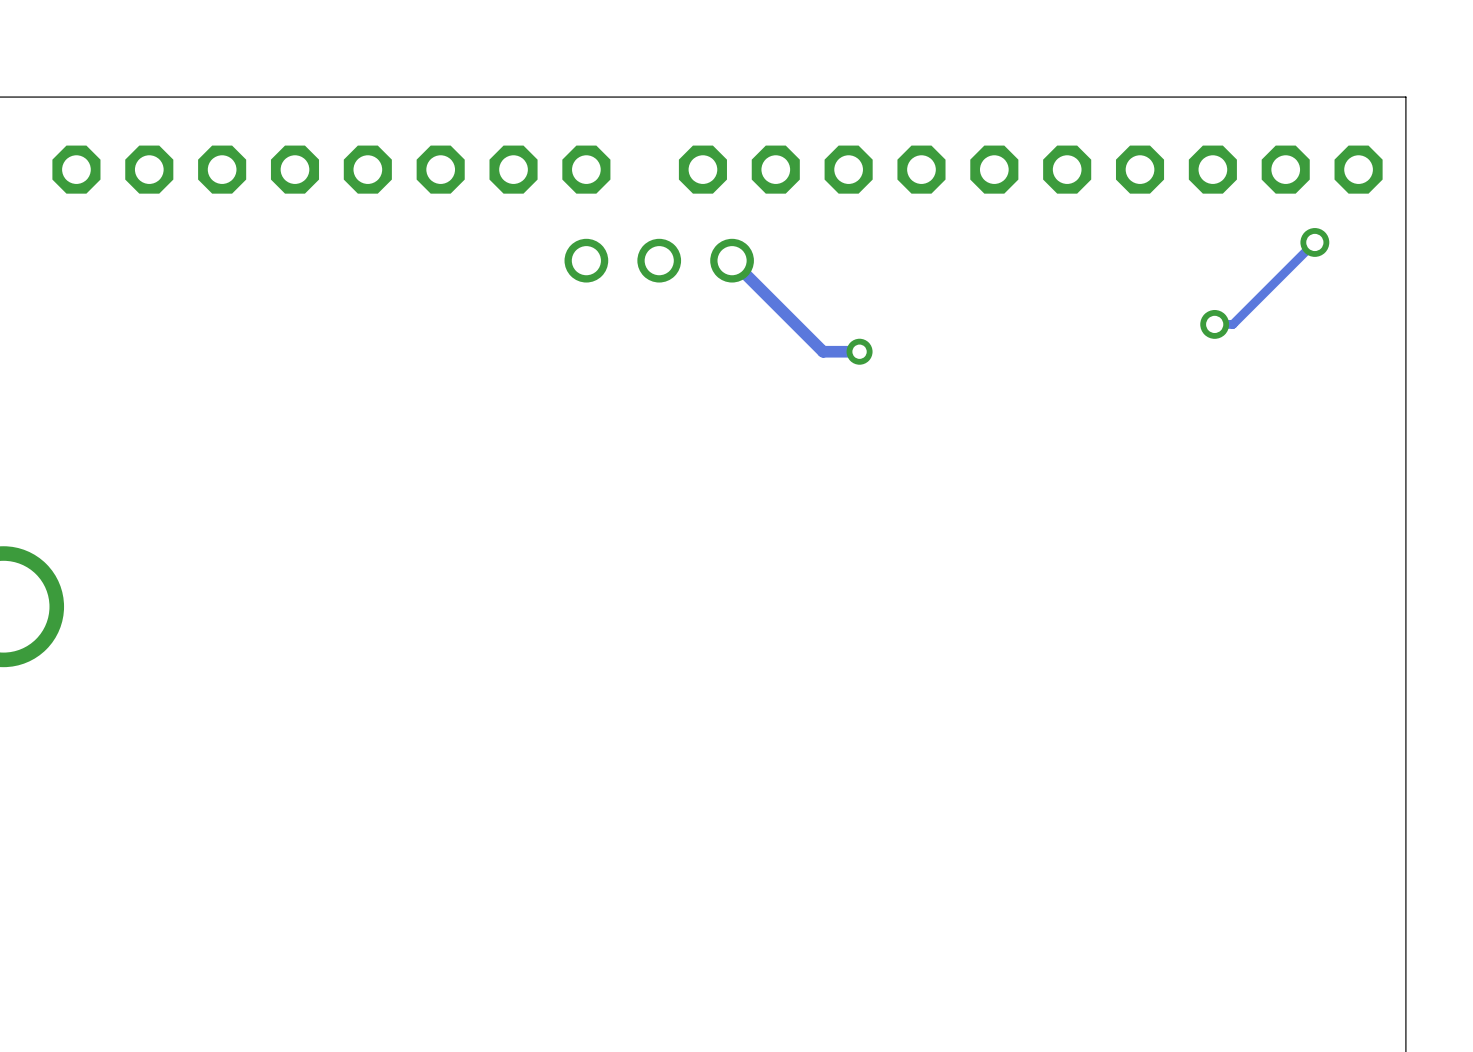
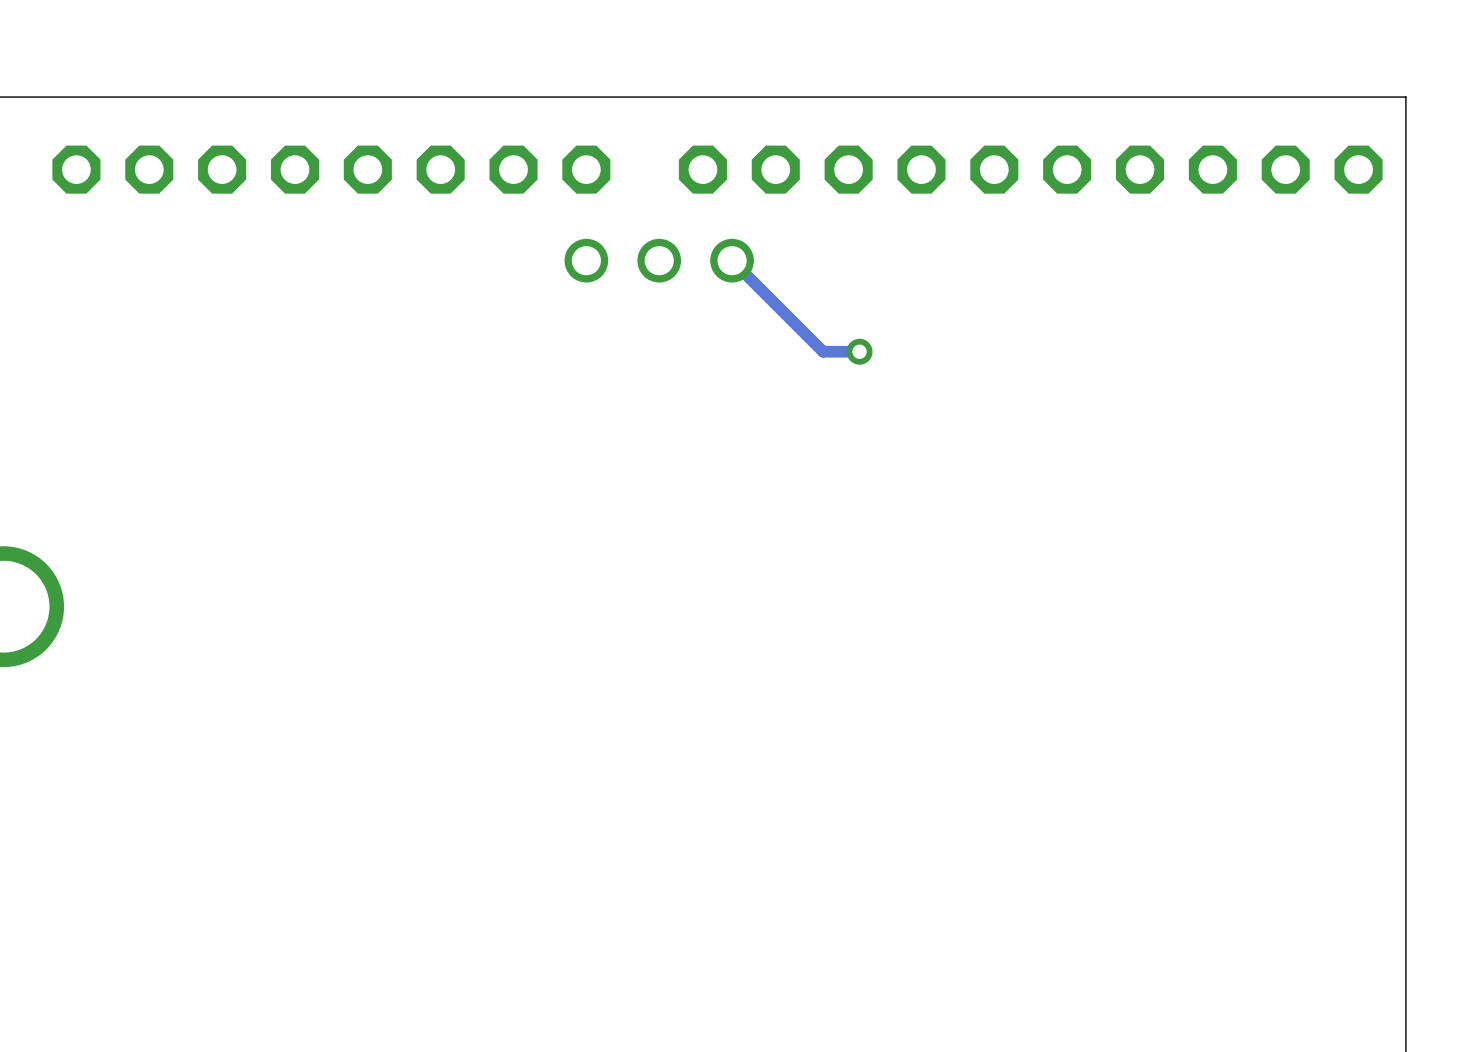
track: (1314, 242) (1232, 324) (1214, 324) -> none
via: (1314, 242) -> none
via: (1214, 324) -> none

